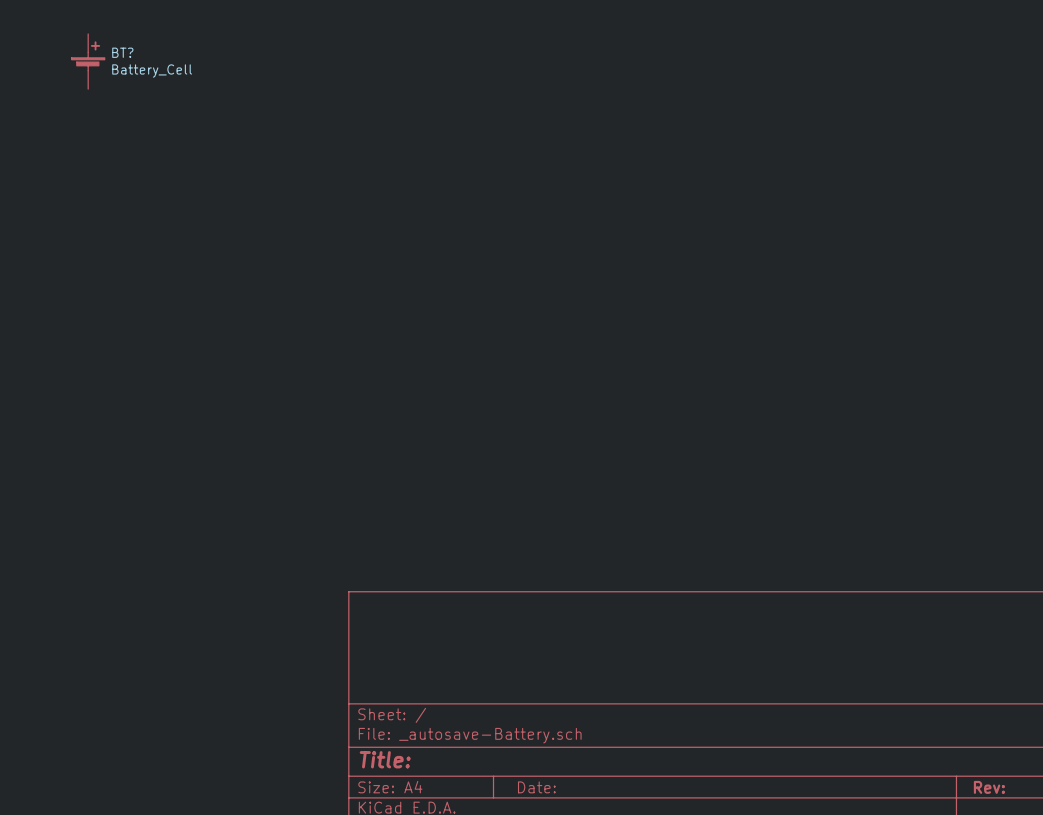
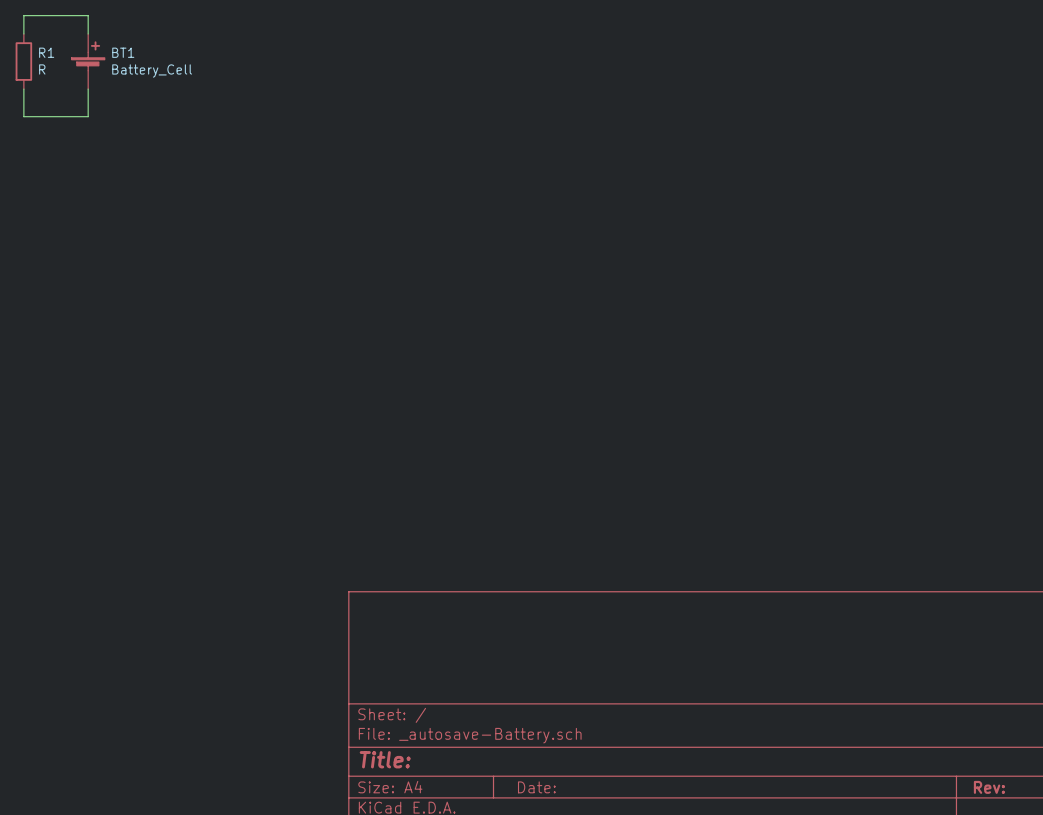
wire: none -> (23, 33) (23, 15) (88, 15) (88, 33)
BT? name: BT? (122, 52) -> BT1 (123, 52)
R1: none -> R (23, 61)
wire: none -> (23, 89) (23, 116) (88, 116) (88, 89)

